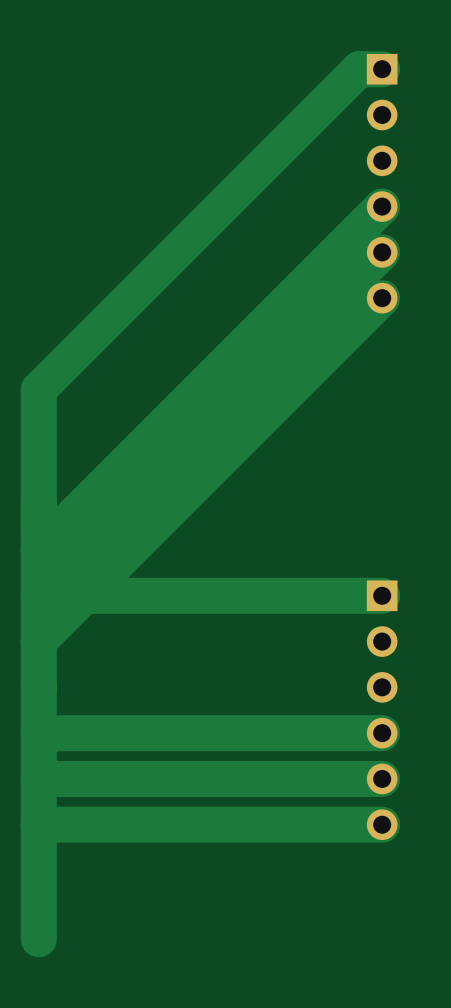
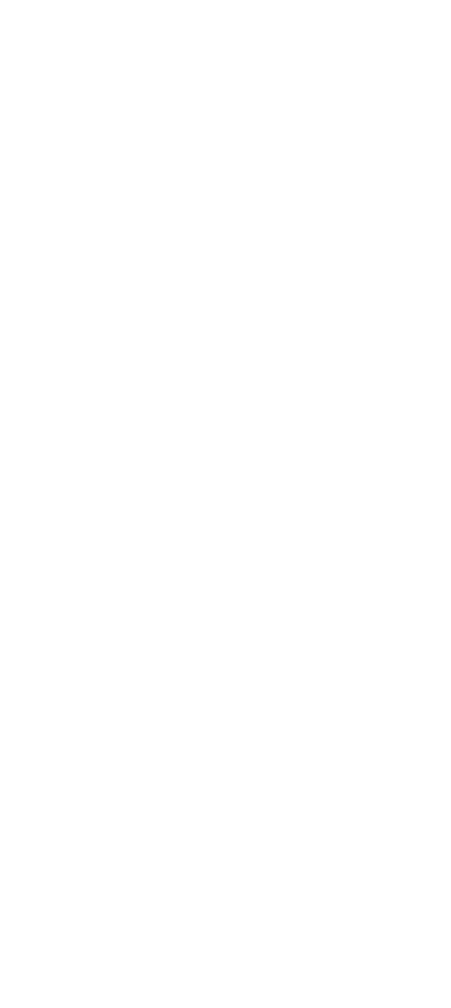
track: (382, 69) (359, 69) (38, 389) (38, 939) -> none
part: (382, 183) -> none
track: (382, 206) (38, 550) -> none
track: (382, 252) (38, 595) -> none
track: (382, 298) (38, 641) -> none
track: (382, 595) (84, 595) -> none
part: (382, 710) -> none
track: (382, 733) (38, 733) -> none
track: (382, 778) (38, 778) -> none
track: (382, 824) (38, 824) -> none

